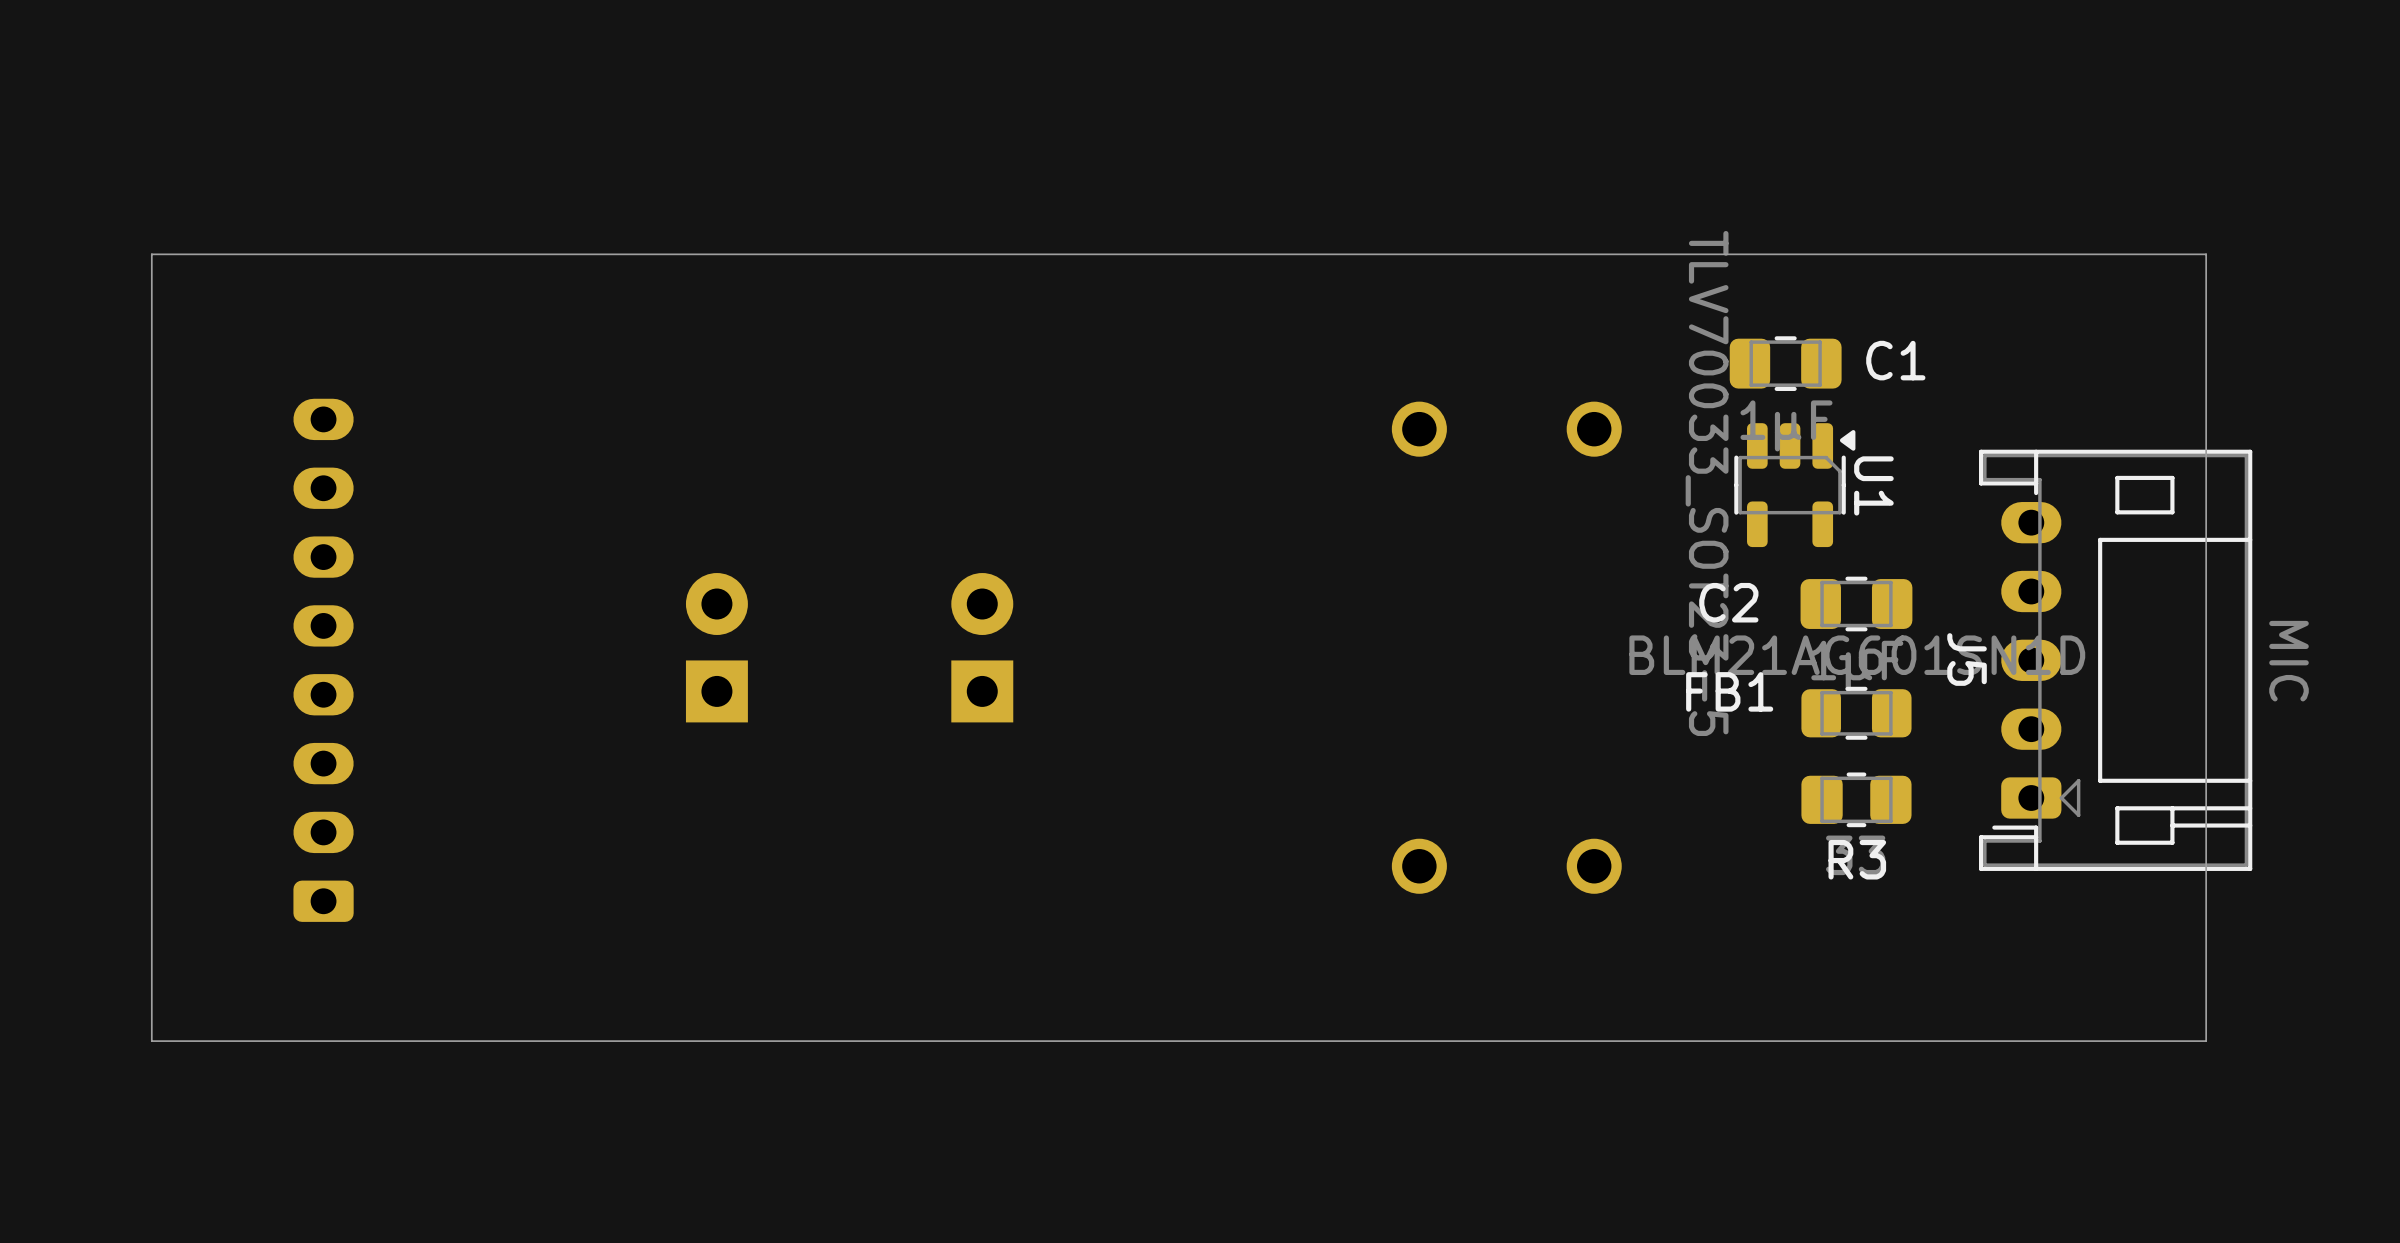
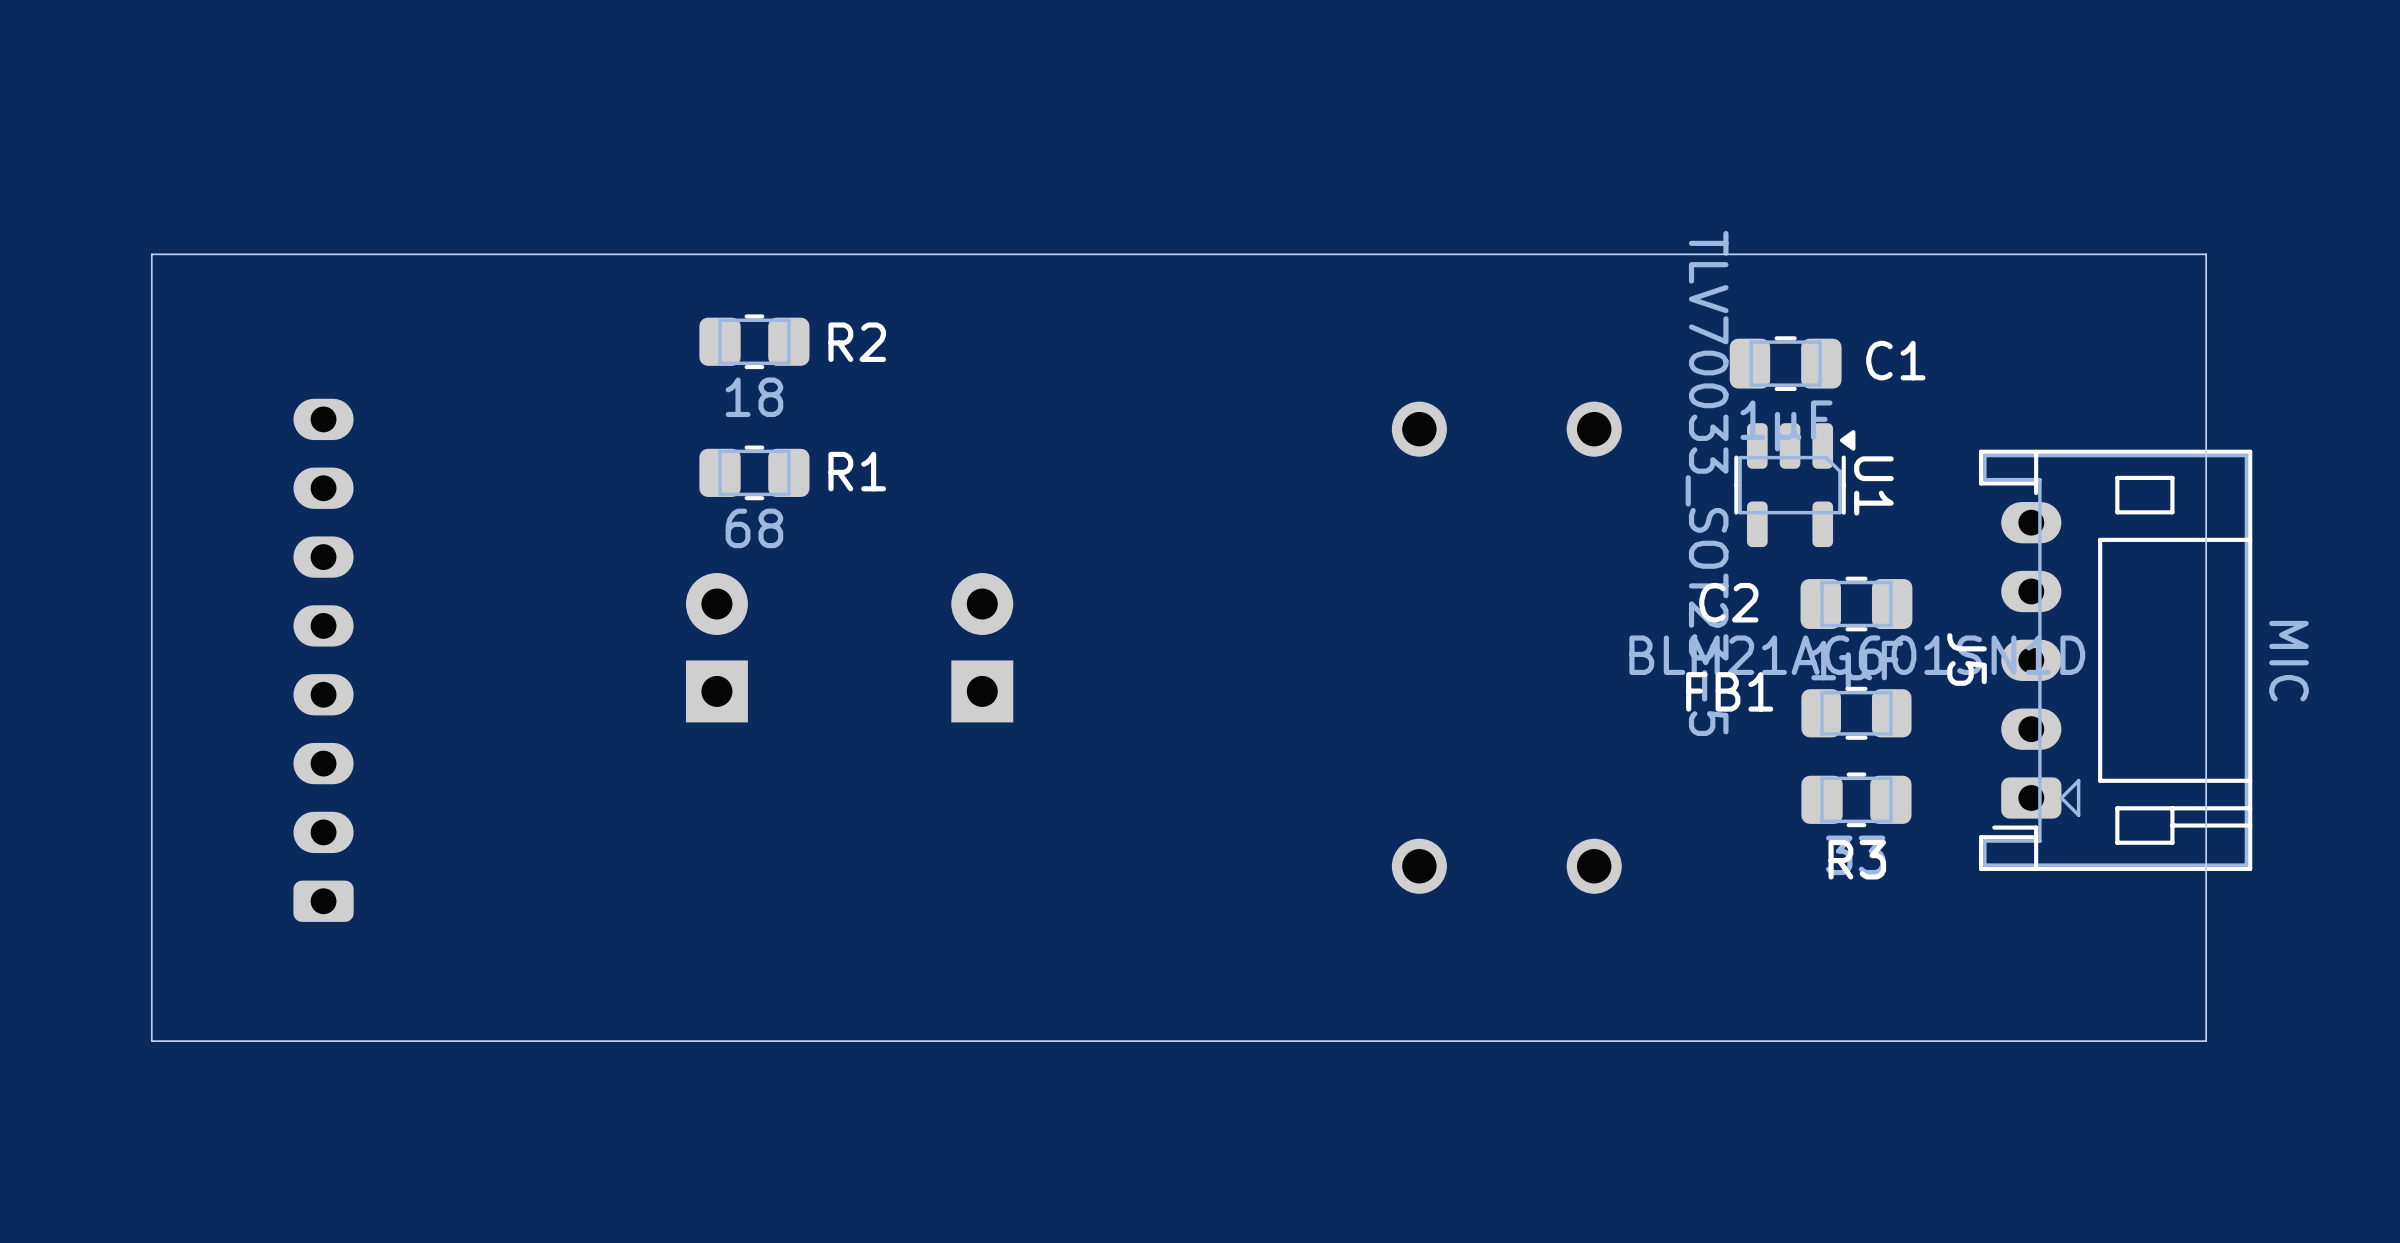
R2: none -> 18 (754, 341)
R1: none -> 68 (754, 472)

